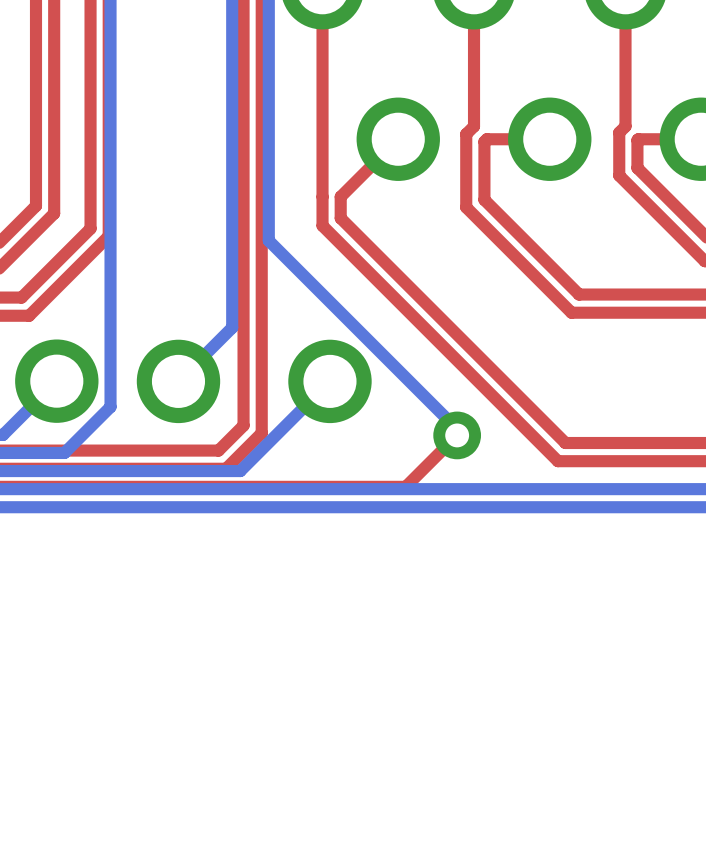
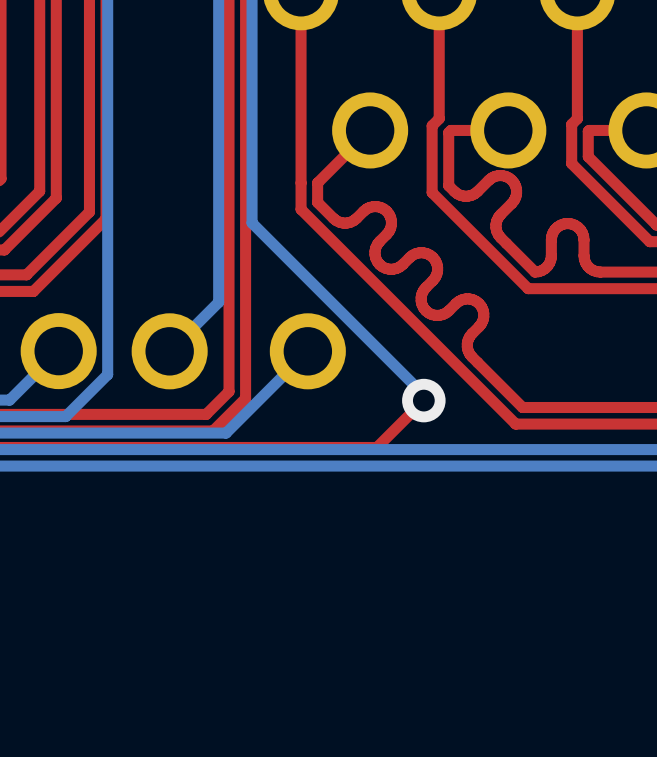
top track: (490, 206) (541, 256) -> (454, 191) (460, 195) (467, 196) (474, 193) (494, 176) (505, 176) (511, 180) (515, 186) (516, 193) (514, 200) (496, 220) (496, 231) (500, 237)
top track: (358, 235) (509, 387) -> (333, 218) (343, 223) (350, 222) (366, 209) (373, 206) (380, 207) (386, 211) (390, 217) (391, 224) (389, 231) (375, 247) (374, 254) (379, 264) (389, 269) (396, 268) (412, 255) (419, 252) (426, 253) (435, 260) (437, 270) (435, 277) (421, 293) (421, 301) (425, 310) (435, 315) (442, 314) (458, 301) (465, 298) (476, 301) (481, 306) (483, 313) (482, 320) (469, 336) (467, 343) (468, 350) (471, 356)
top track: (650, 294) (579, 294) -> (600, 272) (593, 270) (585, 262) (583, 236) (580, 229) (574, 225) (567, 223) (560, 225) (552, 232) (550, 259) (547, 265) (542, 270) (535, 272)

